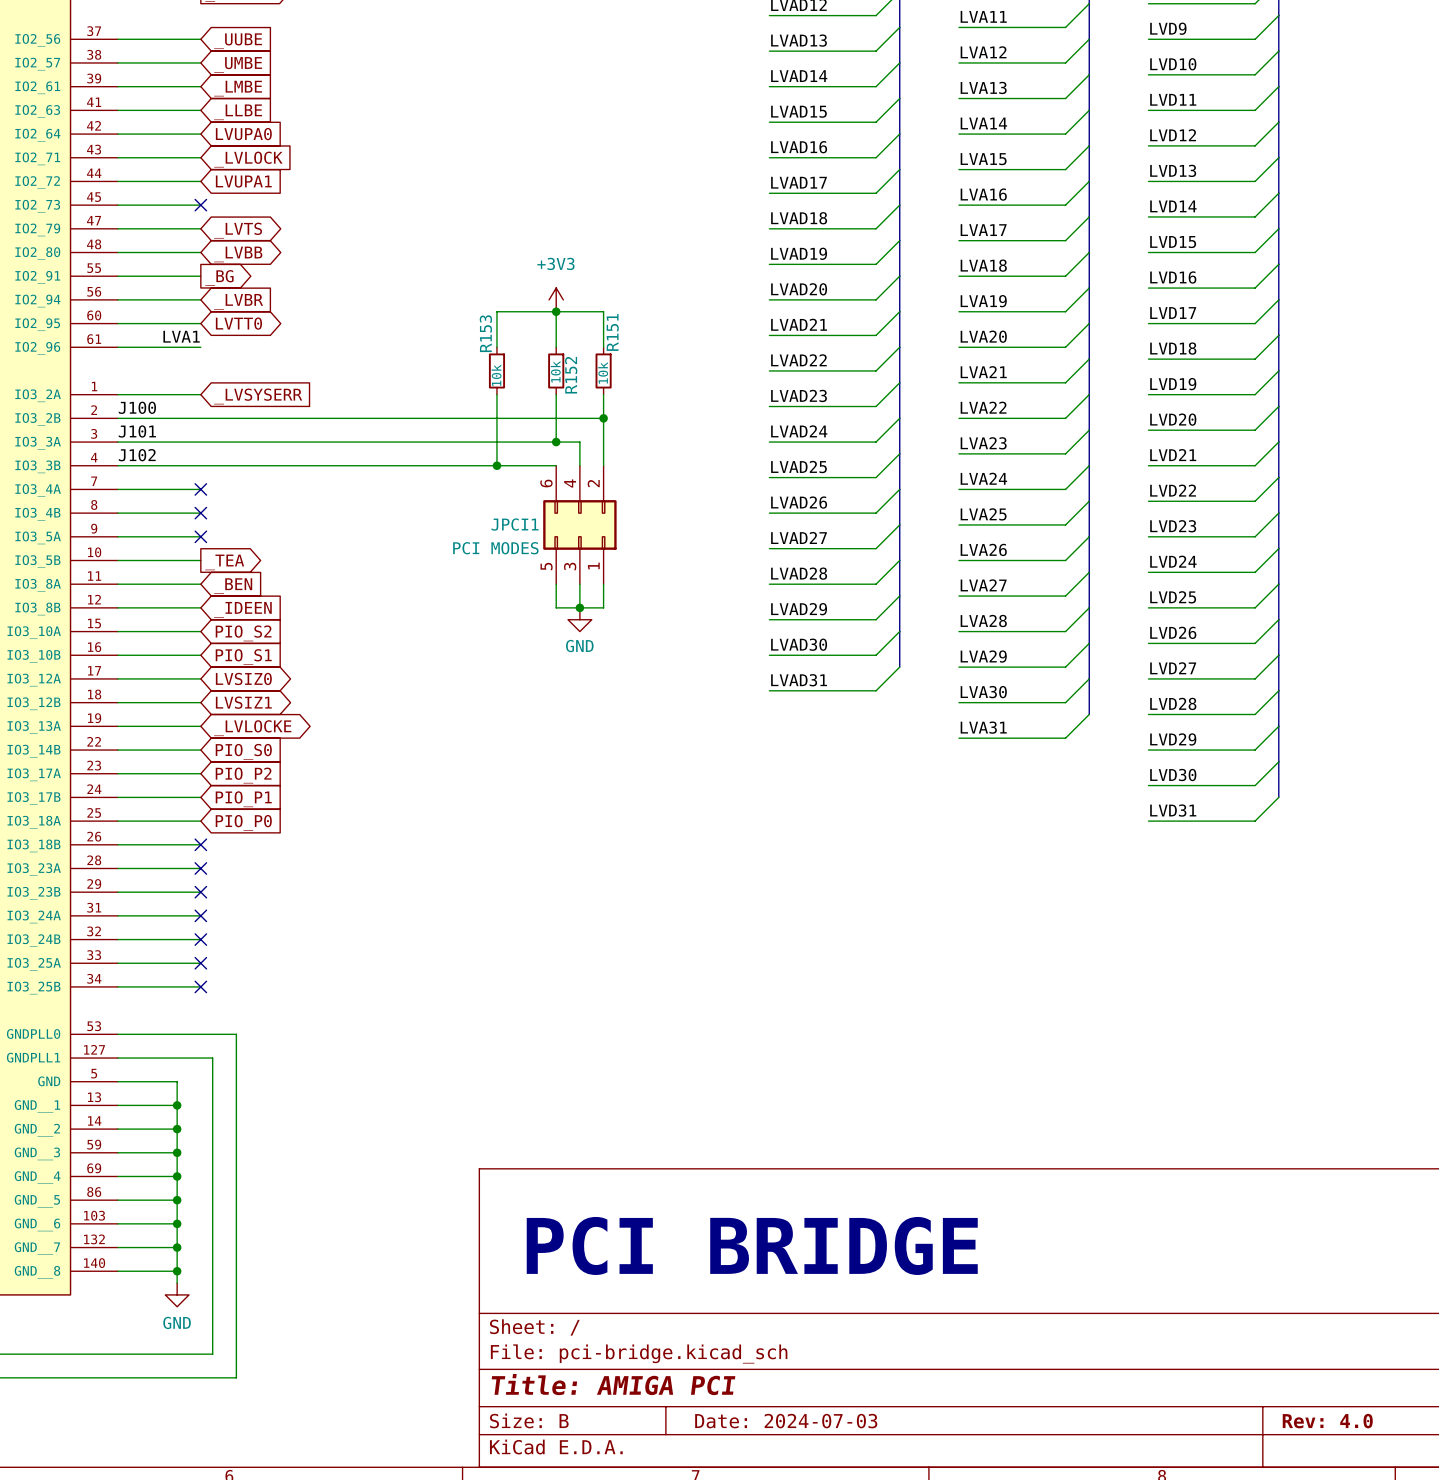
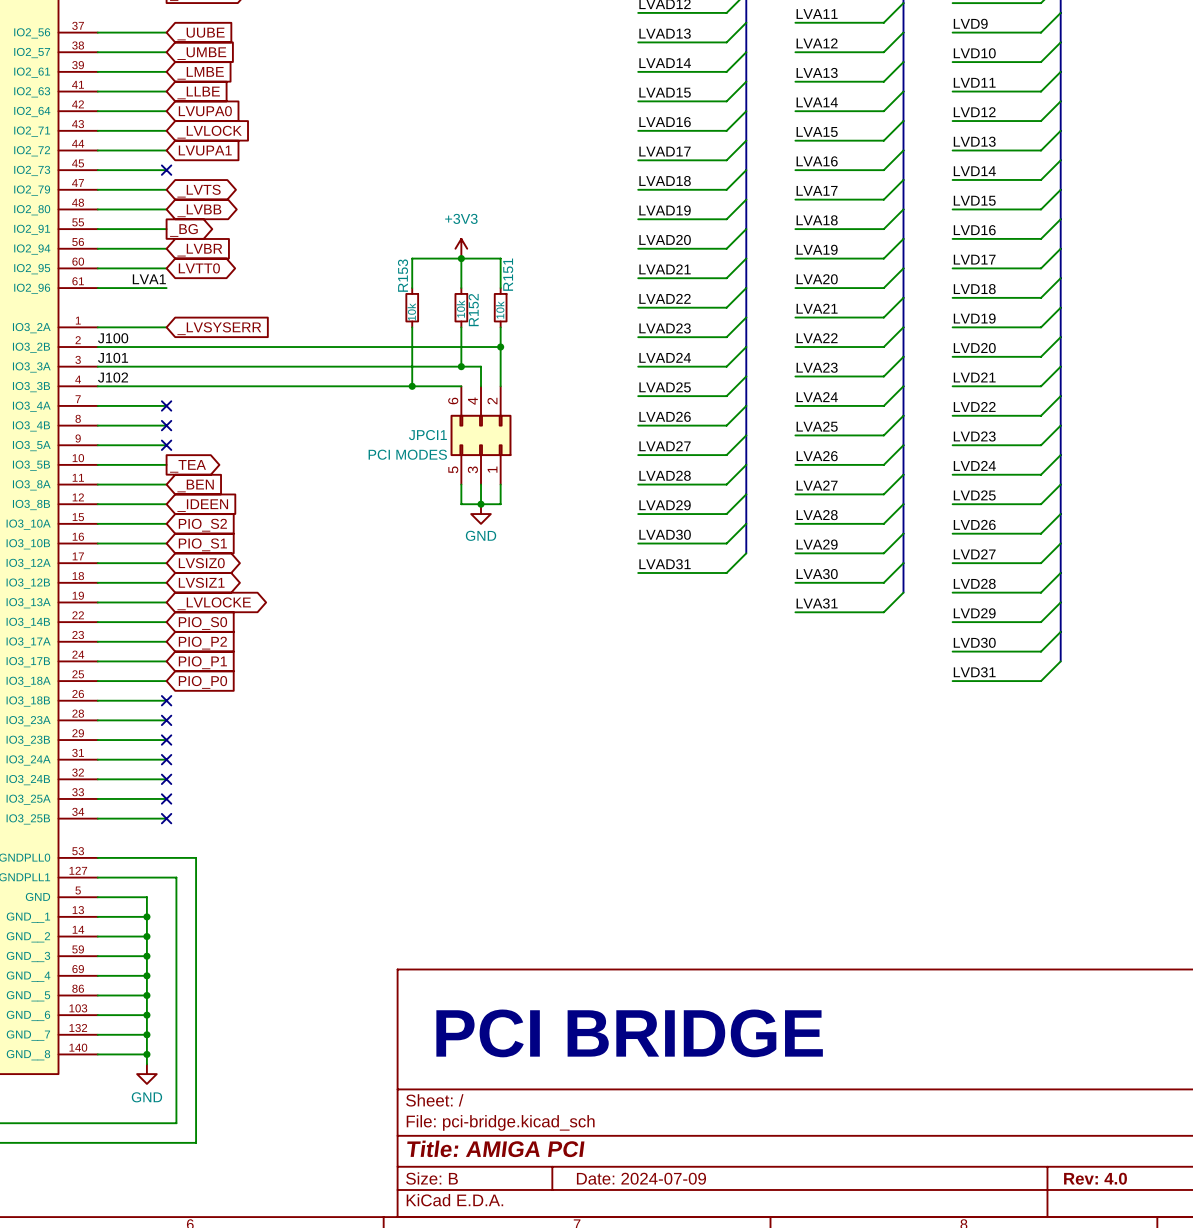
title block: Date: 2024-07-03 (786, 1421) -> Date: 2024-07-09 (641, 1178)

